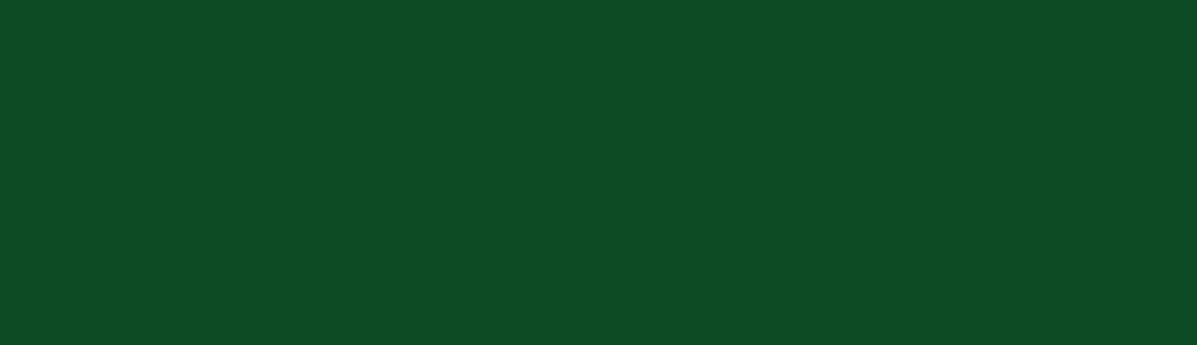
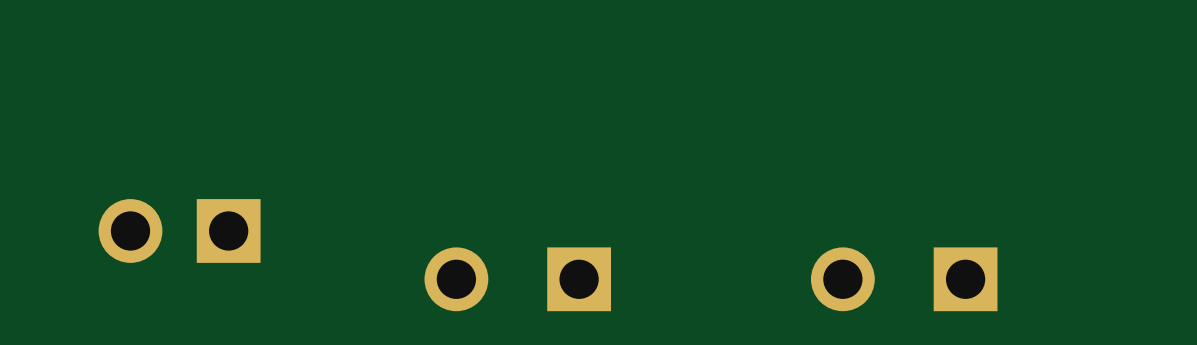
part: none -> (179, 230)
part: none -> (517, 279)
part: none -> (904, 279)

